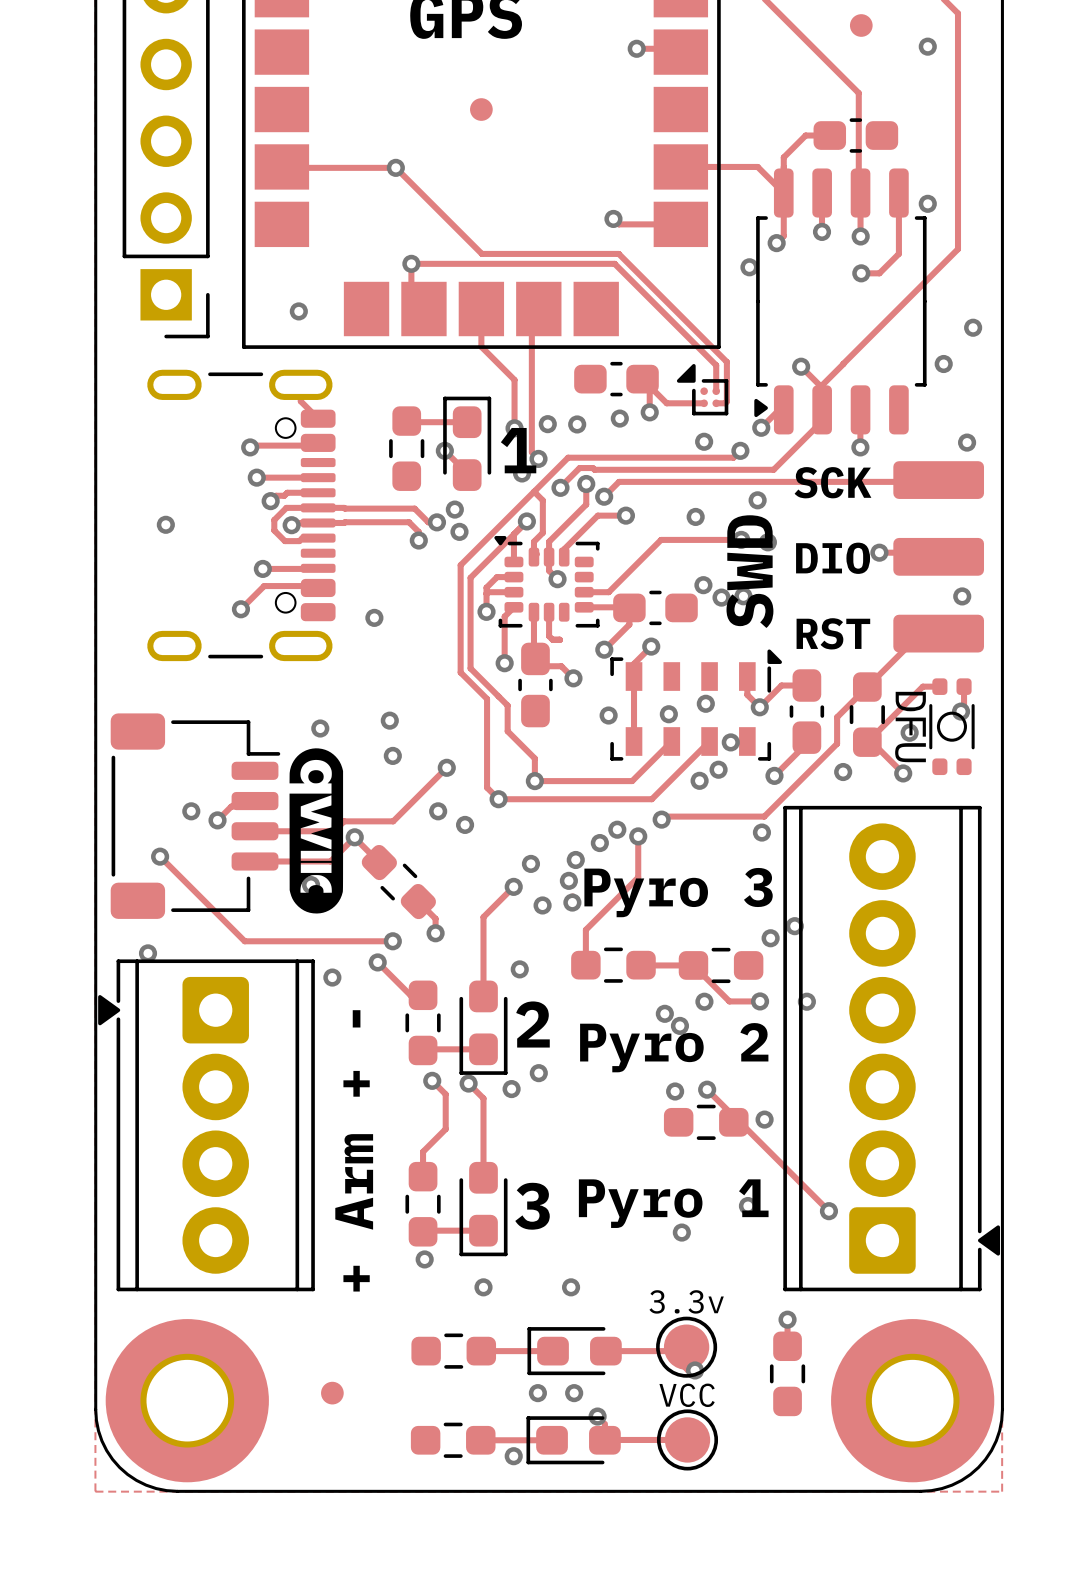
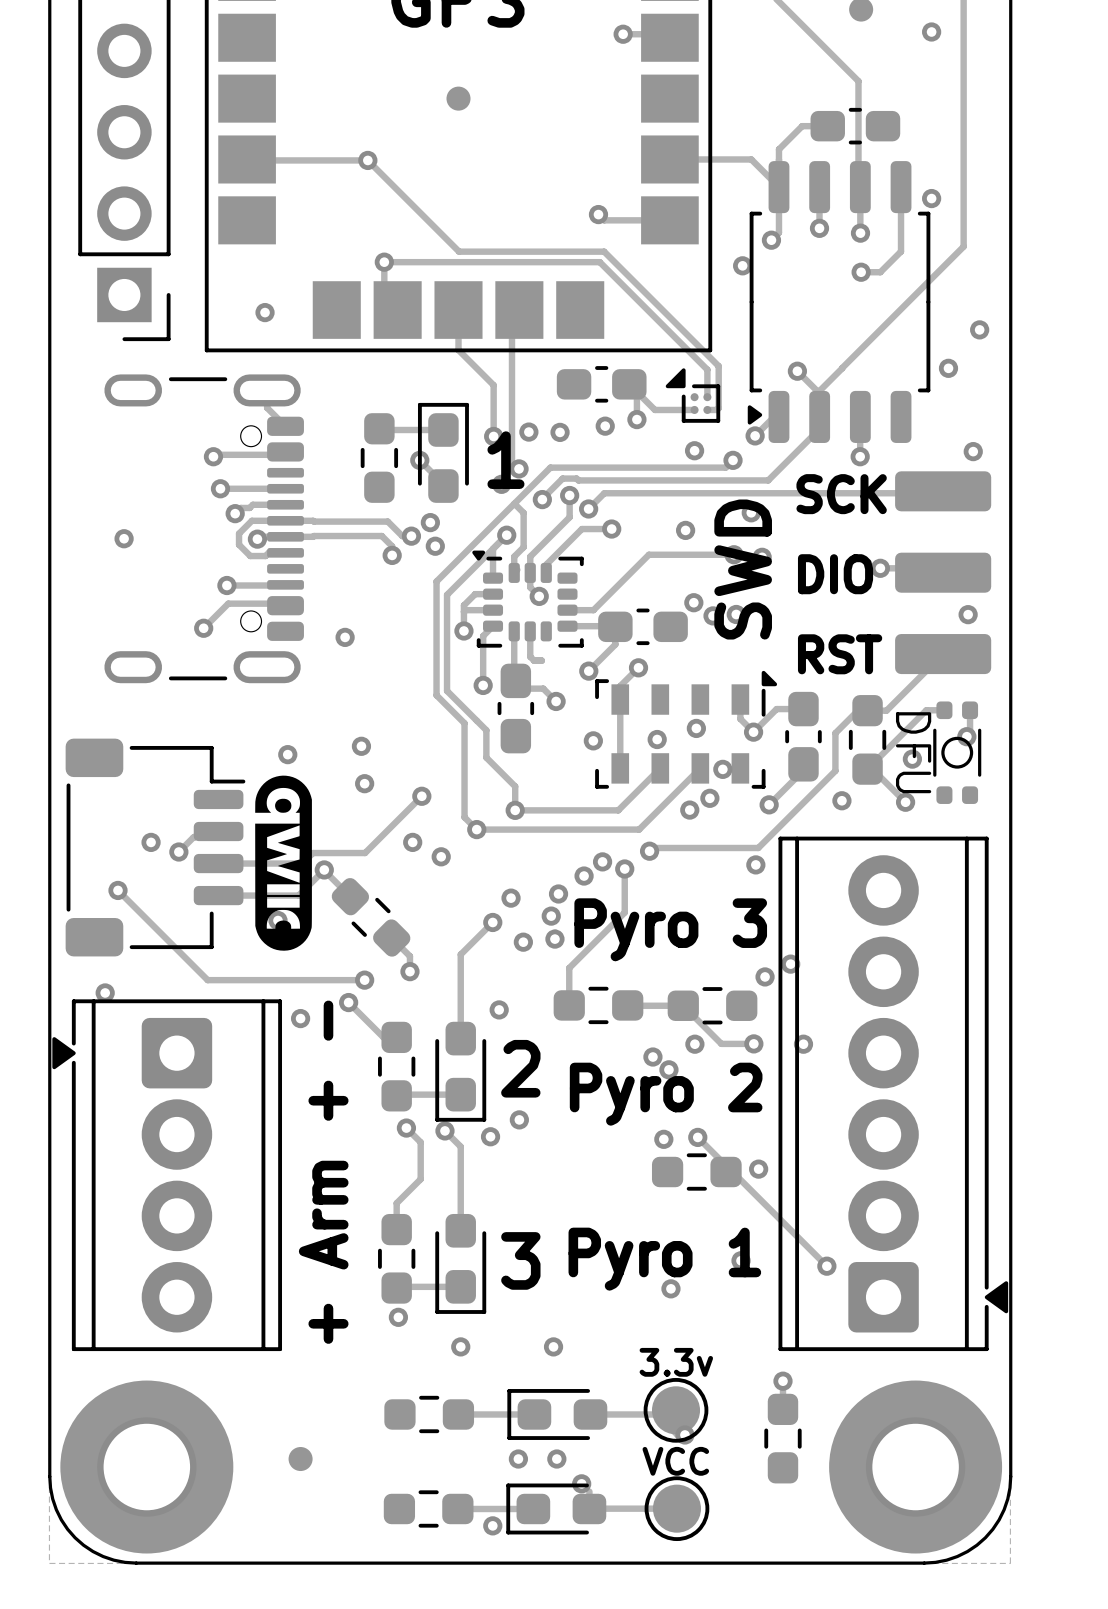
track: (920, 633) (837, 717) -> (942, 654) (886, 710) (857, 710) (835, 733) (835, 742)

